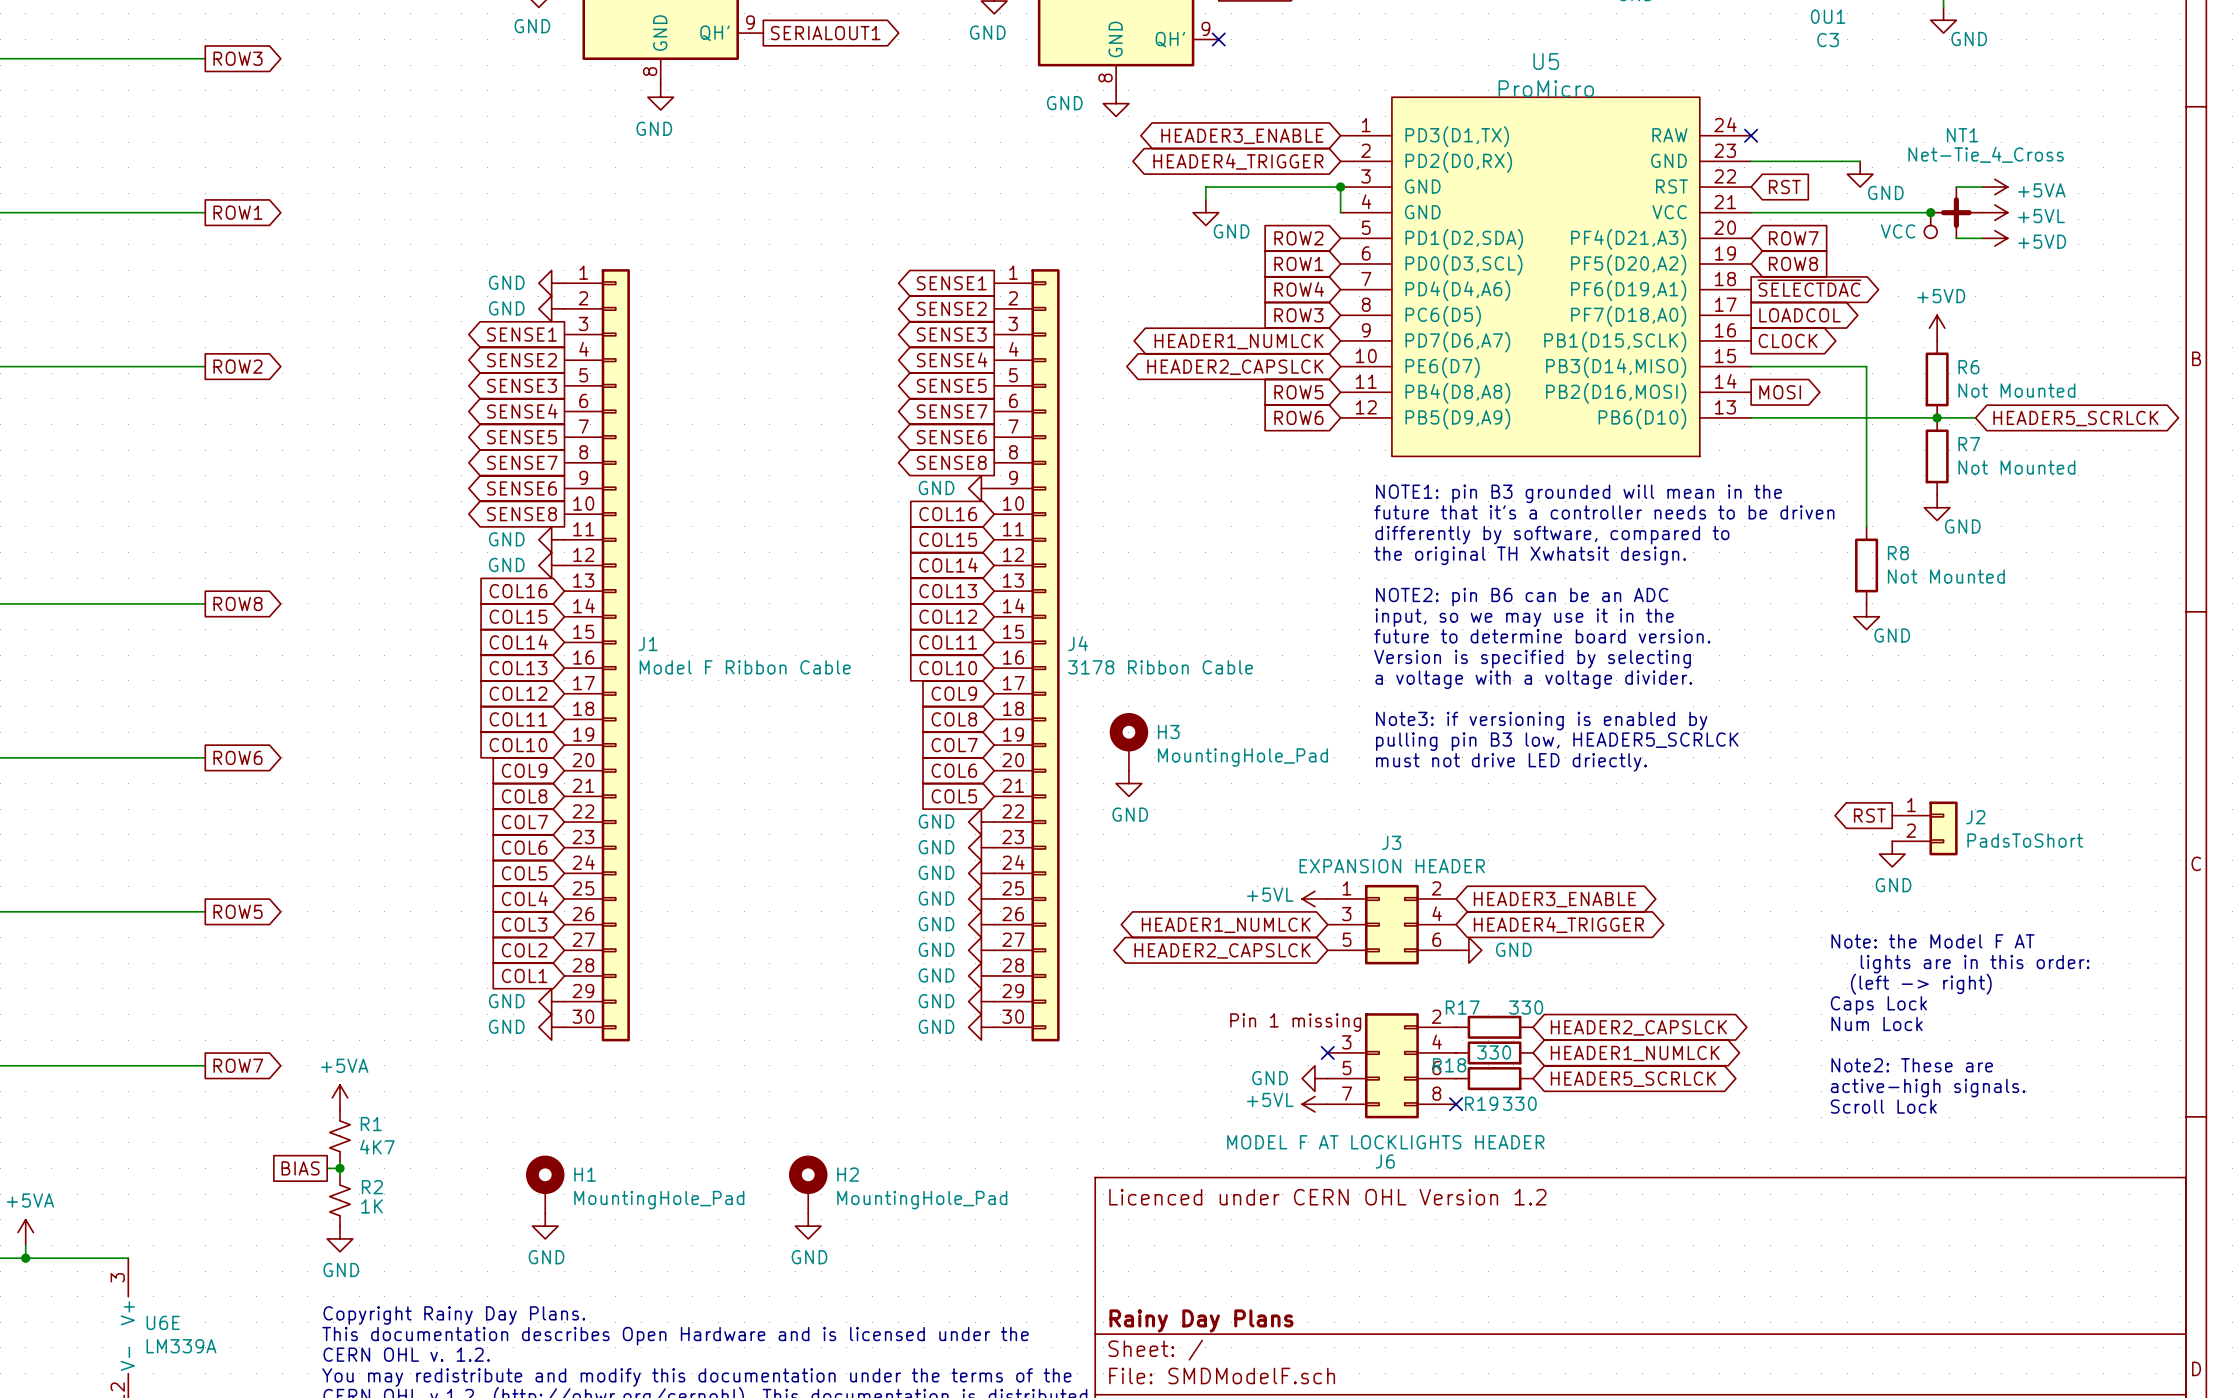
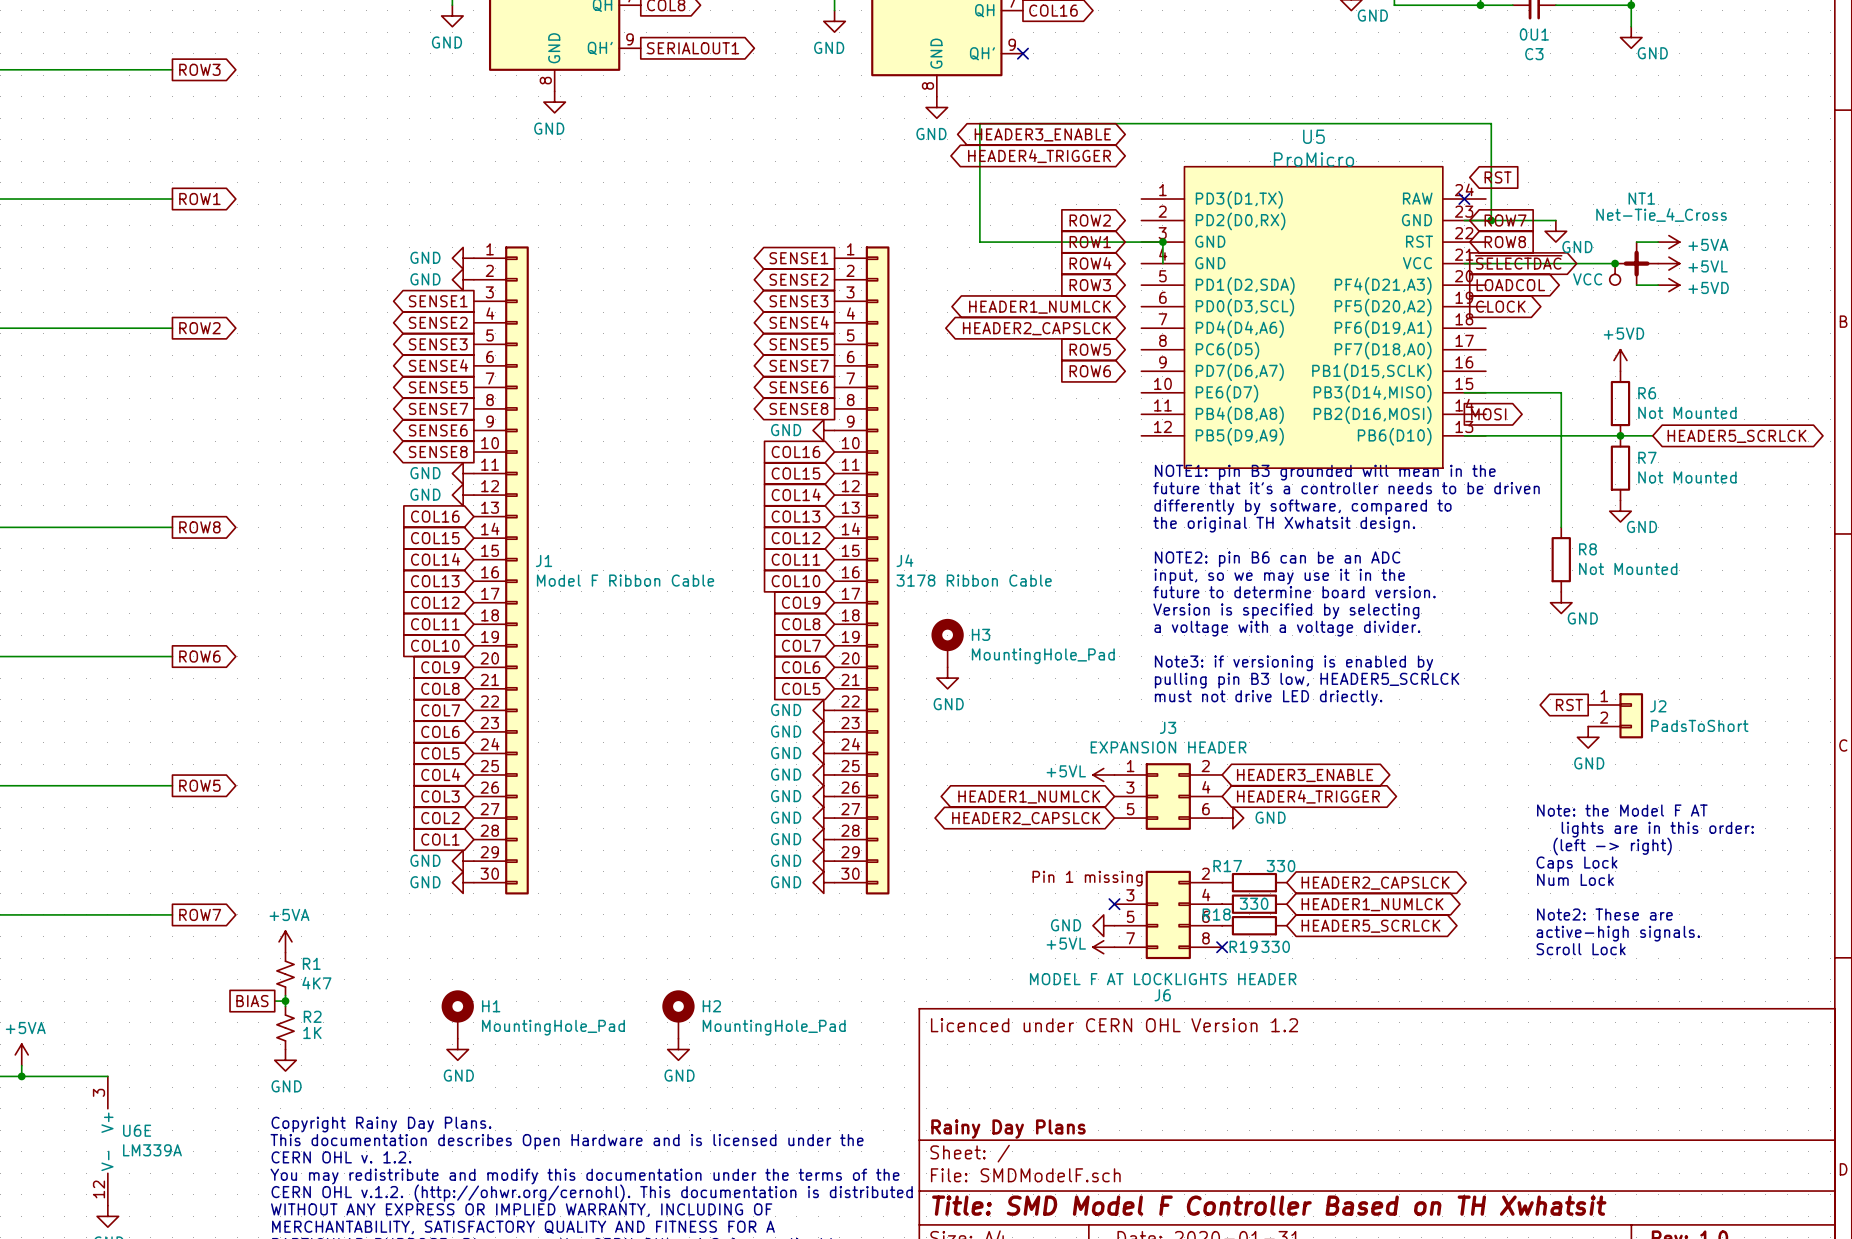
power symbol text position: GND (1064, 103) -> GND (931, 134)
no-connect mark: (1751, 135) -> none
wire: (1751, 161) (1860, 161) -> (1464, 220) (1555, 220)
power symbol position: GND (1860, 174) -> GND (1555, 231)
junction: (1340, 187) -> none
wire: (1956, 187) (1982, 187) -> (1636, 242) (1658, 242)
power symbol position: +5VA (1994, 187) -> +5VA (1668, 242)
wire: (1205, 199) (1205, 187) (1340, 187) (1340, 212) -> none
power symbol: GND (1205, 212) -> none
no-connect mark: none -> (1464, 199)
wire: (1751, 212) (1930, 212) -> (1464, 263) (1615, 263)
junction: (1930, 212) -> none
NT1 position: (1956, 212) -> (1636, 263)
power symbol position: +5VL (1994, 212) -> +5VL (1668, 263)
power symbol position: VCC (1930, 225) -> VCC (1615, 274)
wire: none -> (1491, 220) (1491, 123) (979, 123) (979, 242) (1162, 242) (1162, 263)
junction: none -> (1491, 220)
wire: (1956, 238) (1982, 238) -> (1636, 285) (1658, 285)
power symbol: +5VD (1994, 238) -> none
junction: none -> (1162, 242)
U5 position: (1545, 276) -> (1313, 317)
junction: none -> (1615, 263)
power symbol: none -> +5VD (1668, 285)
power symbol: +5VD (1937, 328) -> none
wire: (1751, 366) (1866, 366) (1866, 526) -> (1464, 392) (1561, 392) (1561, 527)
R6 position: (1937, 379) -> (1620, 403)
global label position: MOSI (1780, 392) -> MOSI (1488, 414)
power symbol: none -> +5VD (1620, 360)
wire: (1751, 417) (1975, 417) -> (1464, 435) (1652, 435)
junction: (1937, 417) -> none
global label position: HEADER5_SCRLCK (2075, 418) -> HEADER5_SCRLCK (1737, 436)
R7 position: (1937, 456) -> (1620, 468)
text position: NOTE1: pin B3 grounded will mean in the (1578, 493) -> NOTE1: pin B3 grounded will mean in the (1325, 472)
junction: none -> (1620, 435)
power symbol: GND (1937, 507) -> none
text position: future that it's a controller needs to be driven (1604, 512) -> future that it's a controller needs to be driven (1346, 488)
text position: differently by software, compared to (1552, 535) -> differently by software, compared to (1302, 507)
text position: the original TH Xwhatsit design. (1530, 555) -> the original TH Xwhatsit design. (1284, 524)
R8 position: (1866, 565) -> (1561, 559)
power symbol: none -> GND (1620, 511)
text position: NOTE2: pin B6 can be an ADC (1522, 597) -> NOTE2: pin B6 can be an ADC (1277, 559)
power symbol: GND (1866, 616) -> none
text position: input, so we may use it in the (1524, 617) -> input, so we may use it in the (1279, 576)
text position: future to determine board version. (1542, 636) -> future to determine board version. (1294, 592)
text position: Version is specified by selecting (1532, 659) -> Version is specified by selecting (1286, 611)
text position: a voltage with a voltage divider. (1533, 679) -> a voltage with a voltage divider. (1287, 628)
power symbol: none -> GND (1561, 602)
text position: Note3: if versioning is enabled by (1541, 721) -> Note3: if versioning is enabled by (1293, 663)
text position: pulling pin B3 low, HEADER5_SCRLCK (1557, 741) -> pulling pin B3 low, HEADER5_SCRLCK (1307, 680)
text position: must not drive LED driectly. (1511, 762) -> must not drive LED driectly. (1268, 697)

